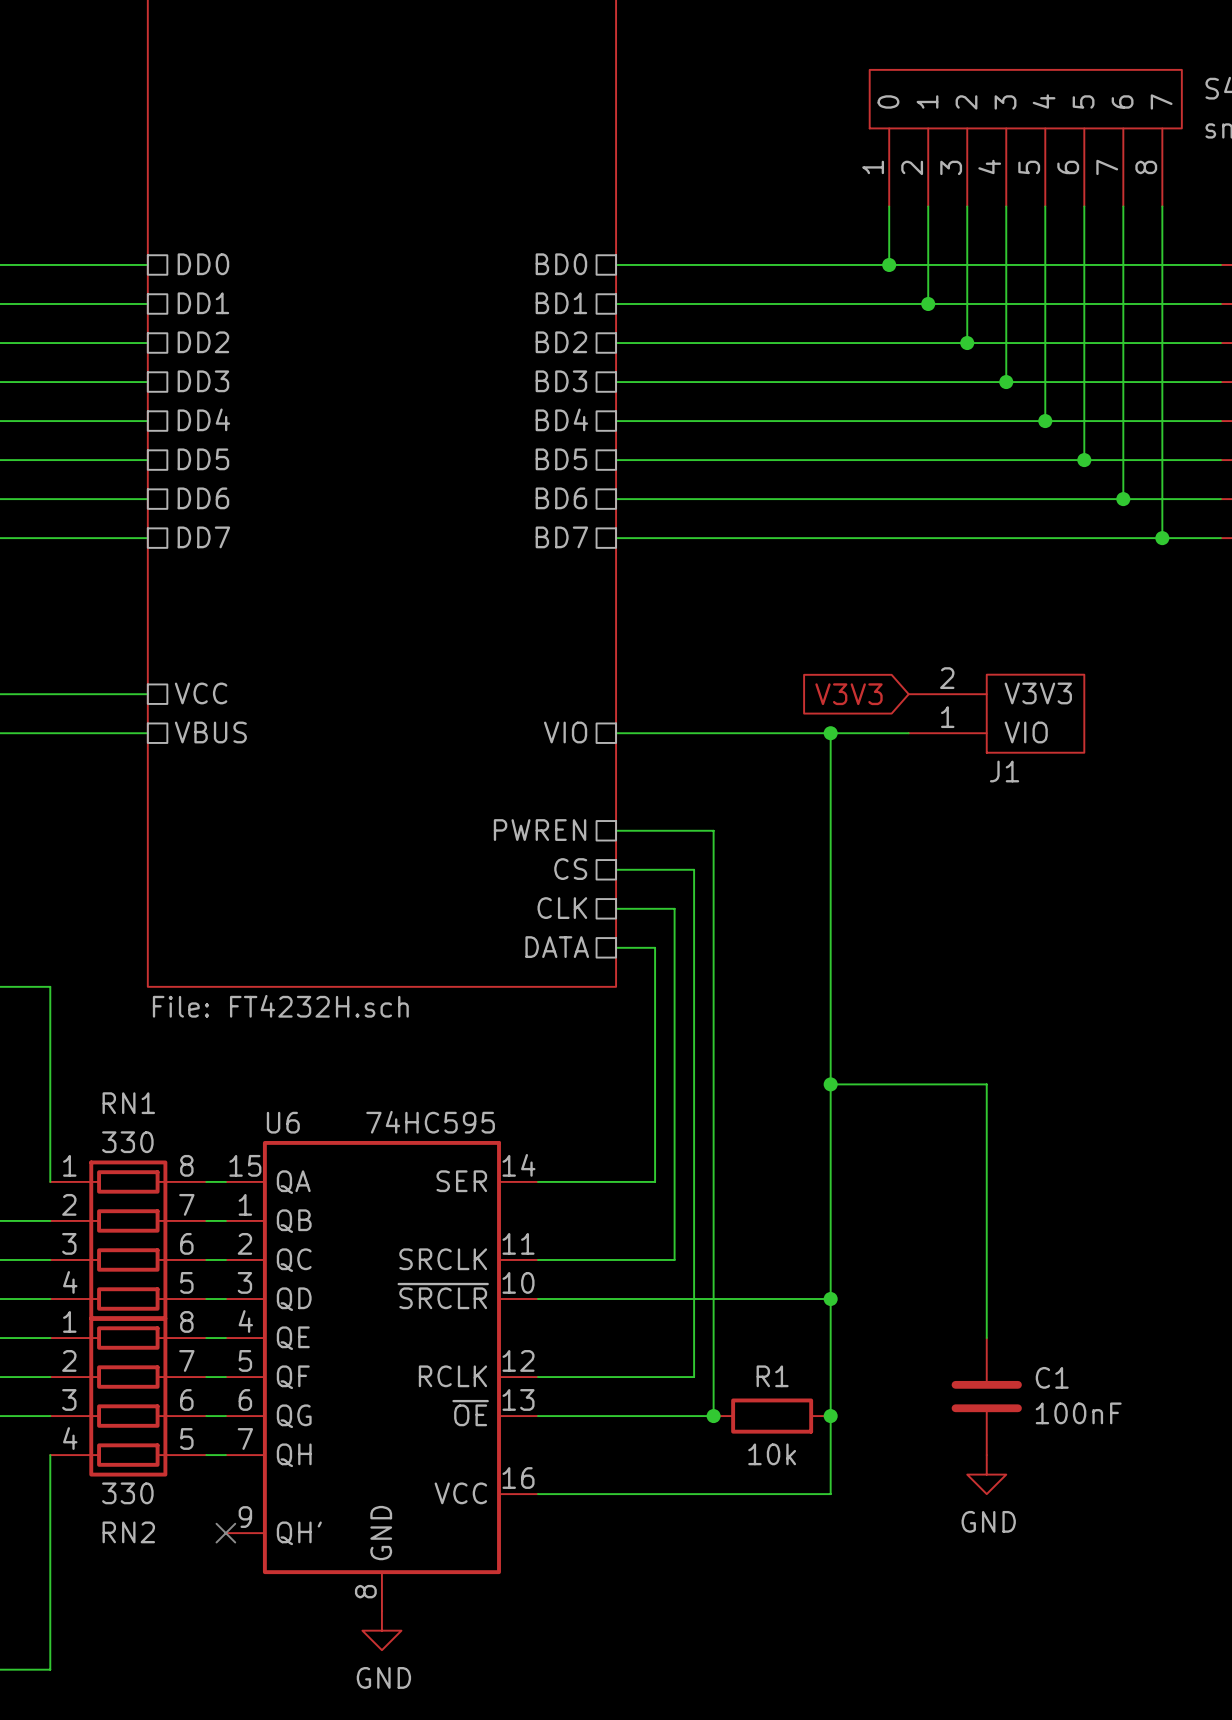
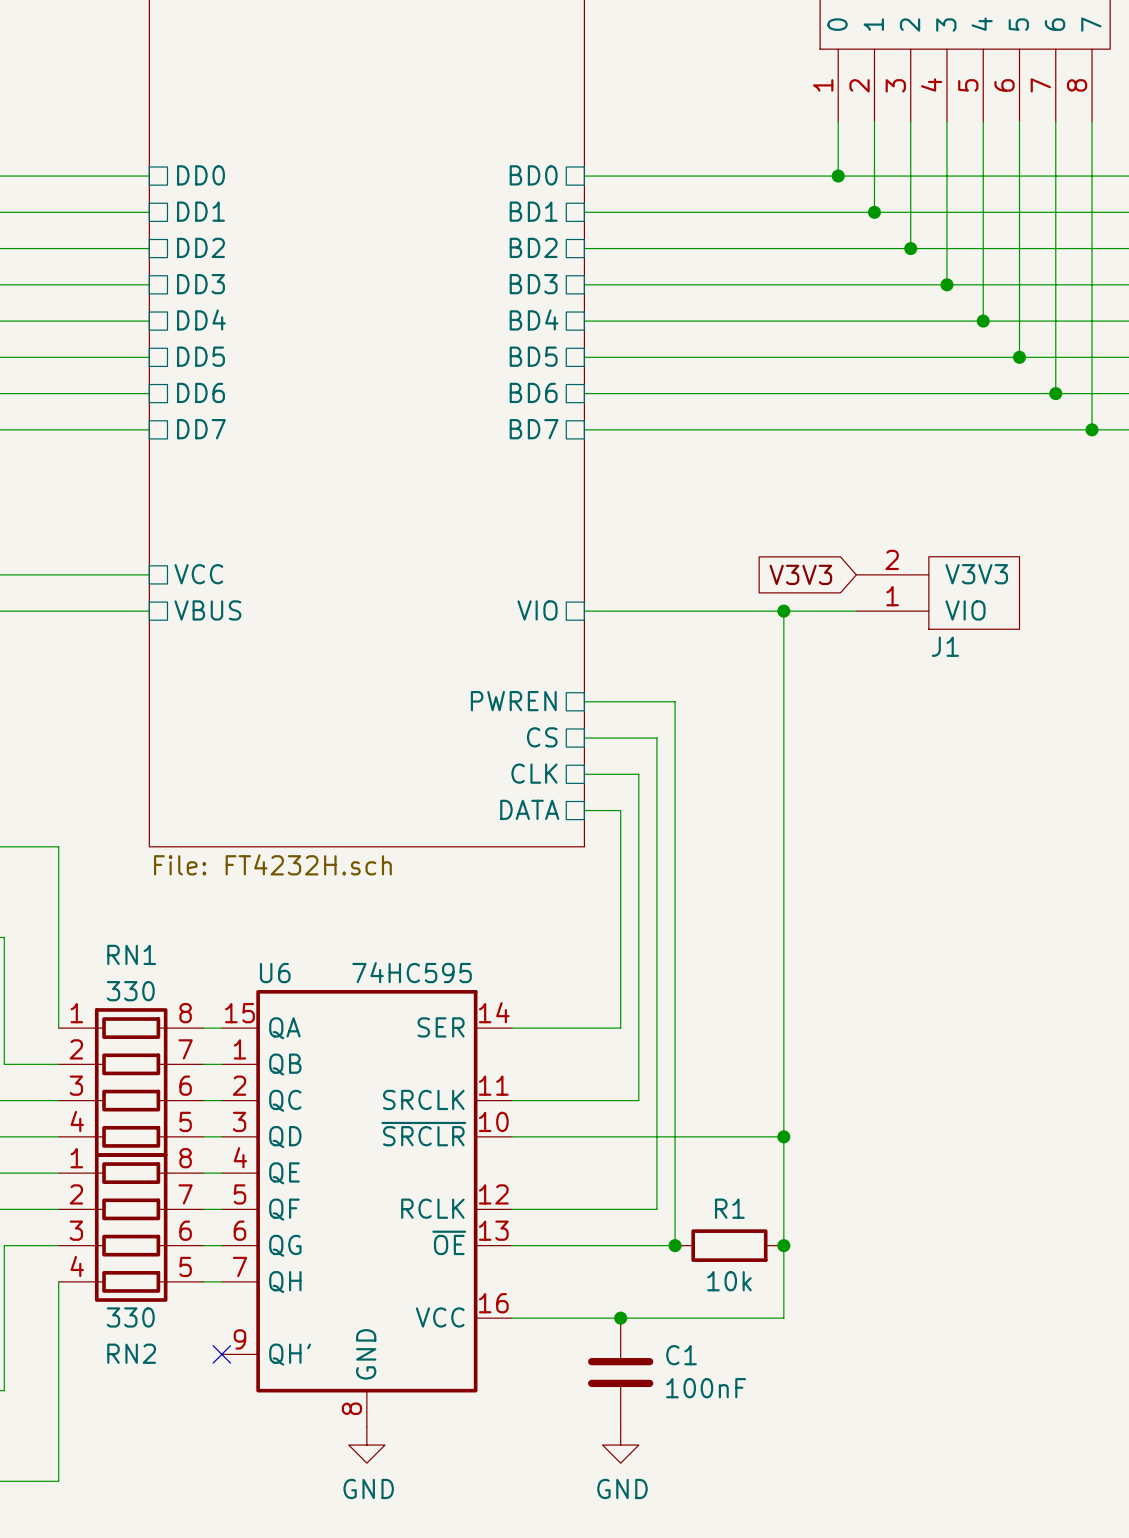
wire: (830, 1084) (986, 1084) (986, 1338) -> none
junction: (830, 1084) -> none
C1 position: (986, 1396) -> (620, 1372)
power symbol: GND (986, 1474) -> none
junction: none -> (620, 1318)
power symbol: none -> GND (620, 1445)

